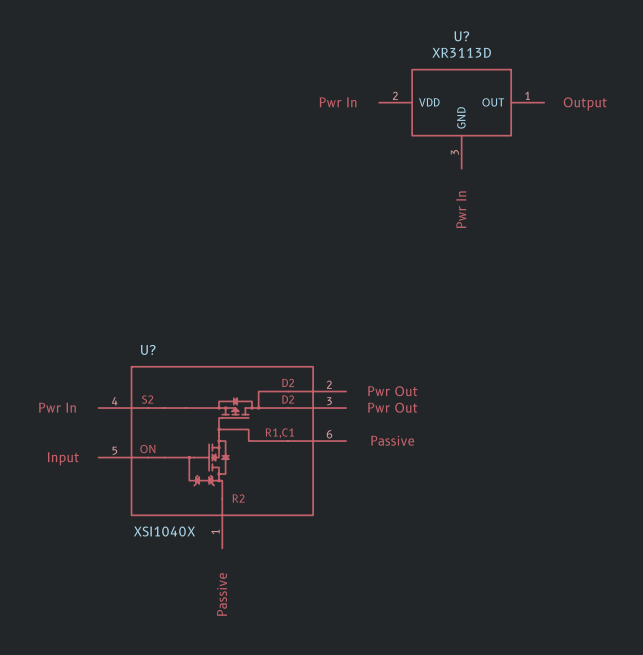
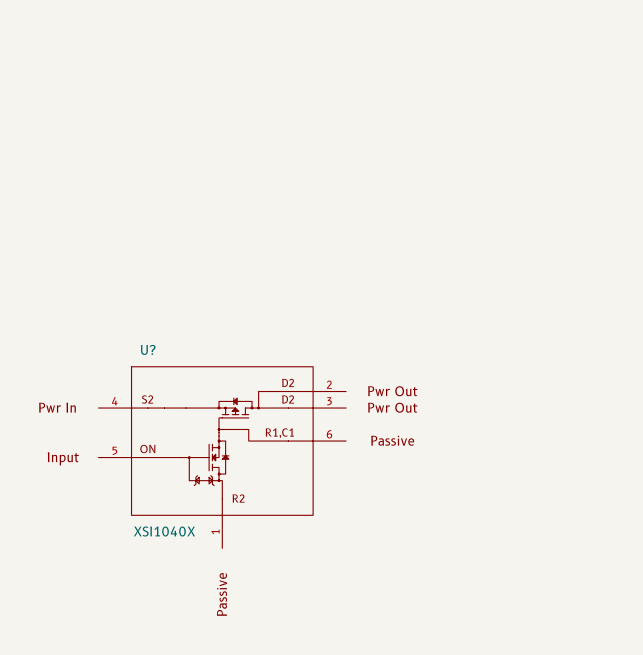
U?: XR3113D (461, 119) -> none

